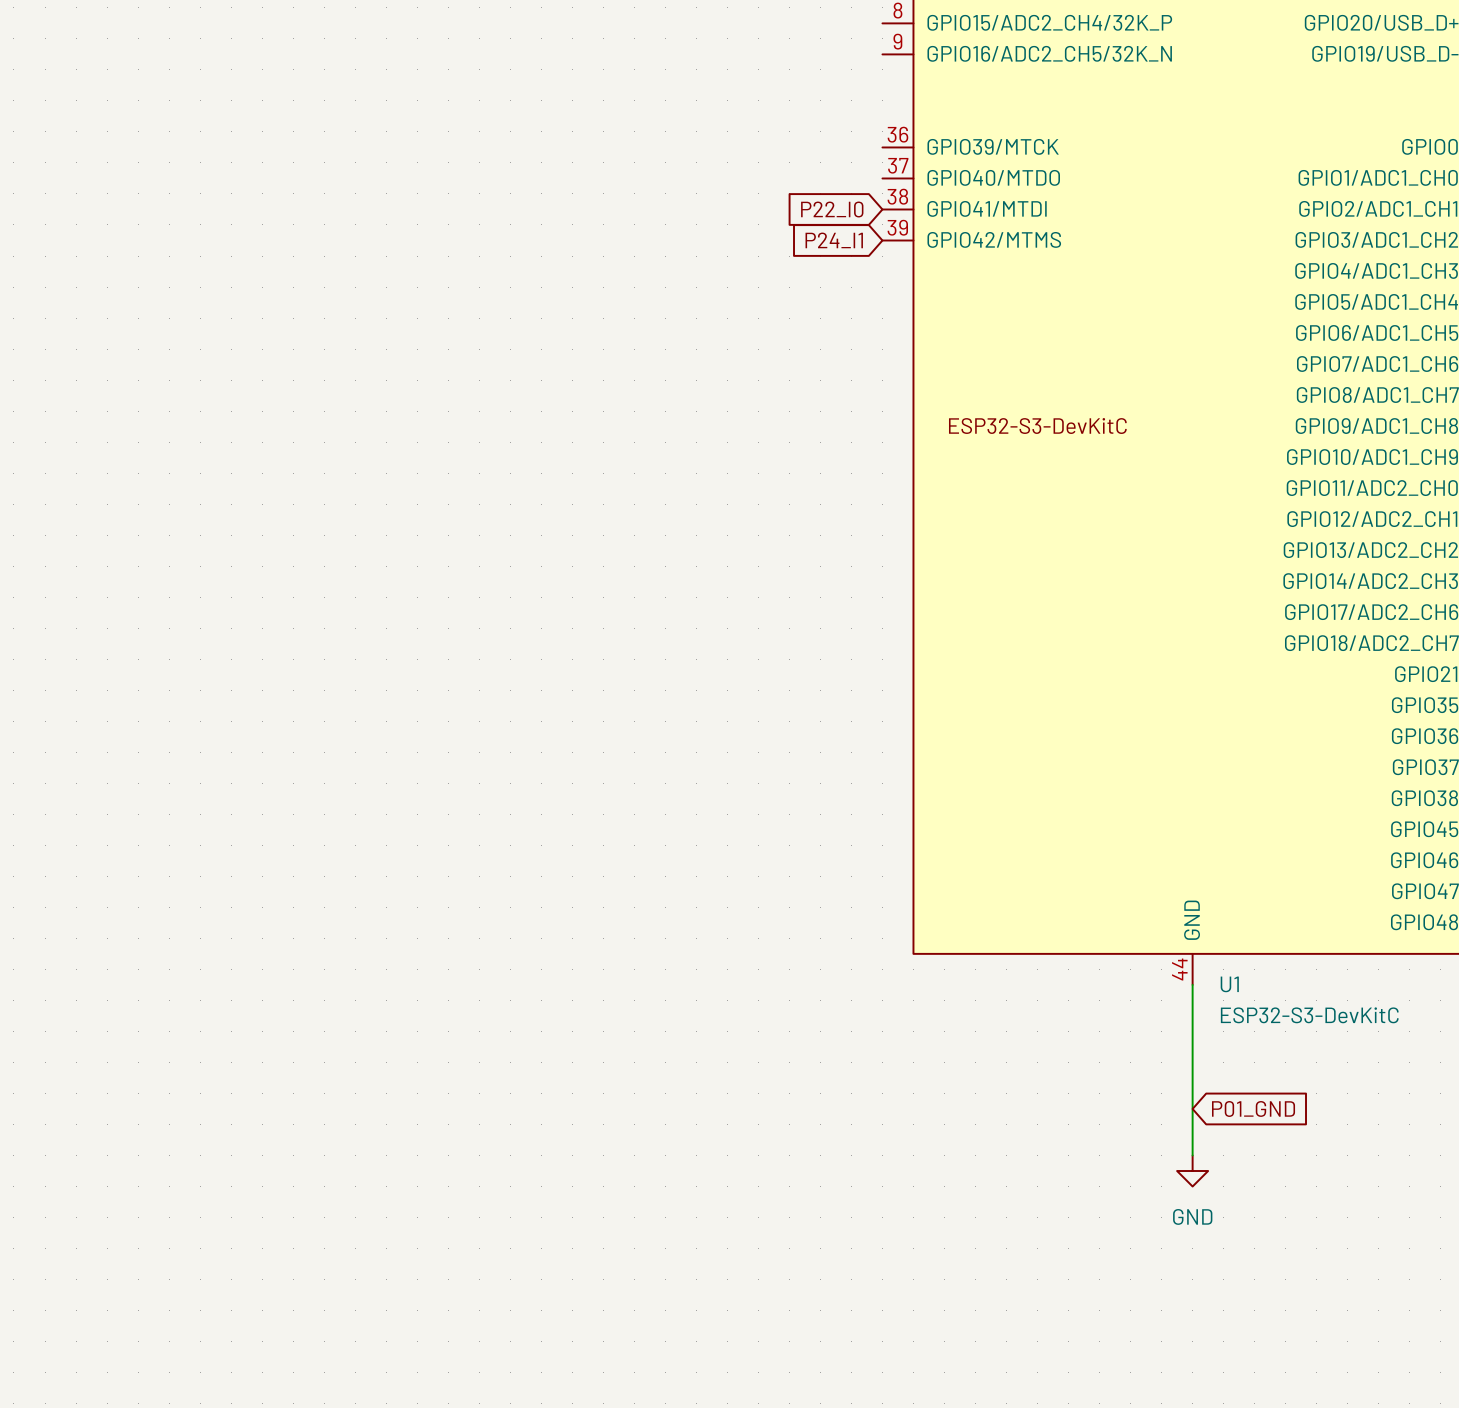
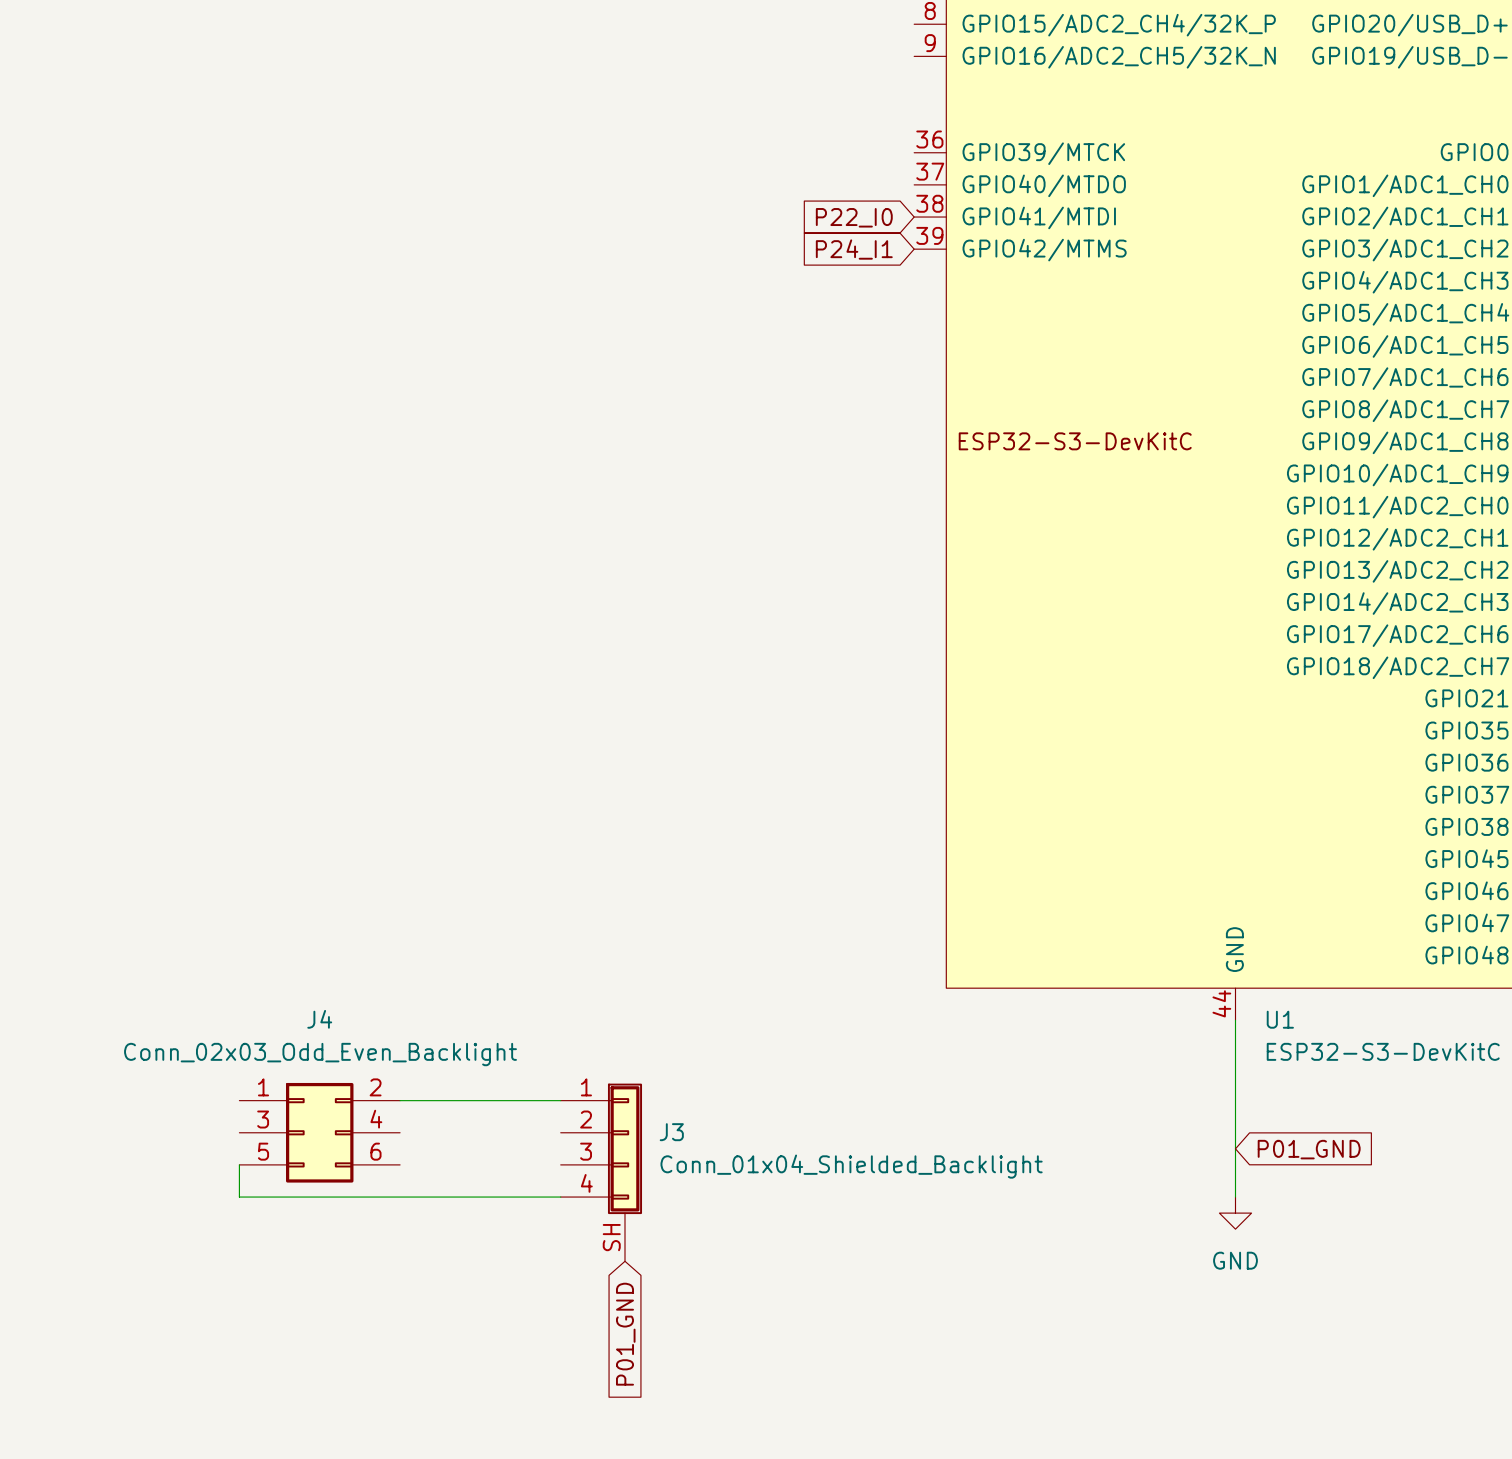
wire: none -> (400, 1100) (560, 1100)
J4: none -> Conn_02x03_Odd_Even_Backlight (319, 1132)
wire: none -> (239, 1164) (239, 1197) (560, 1197)
J3: none -> Conn_01x04_Shielded_Backlight (601, 1172)
global label: none -> P01_GND (625, 1334)

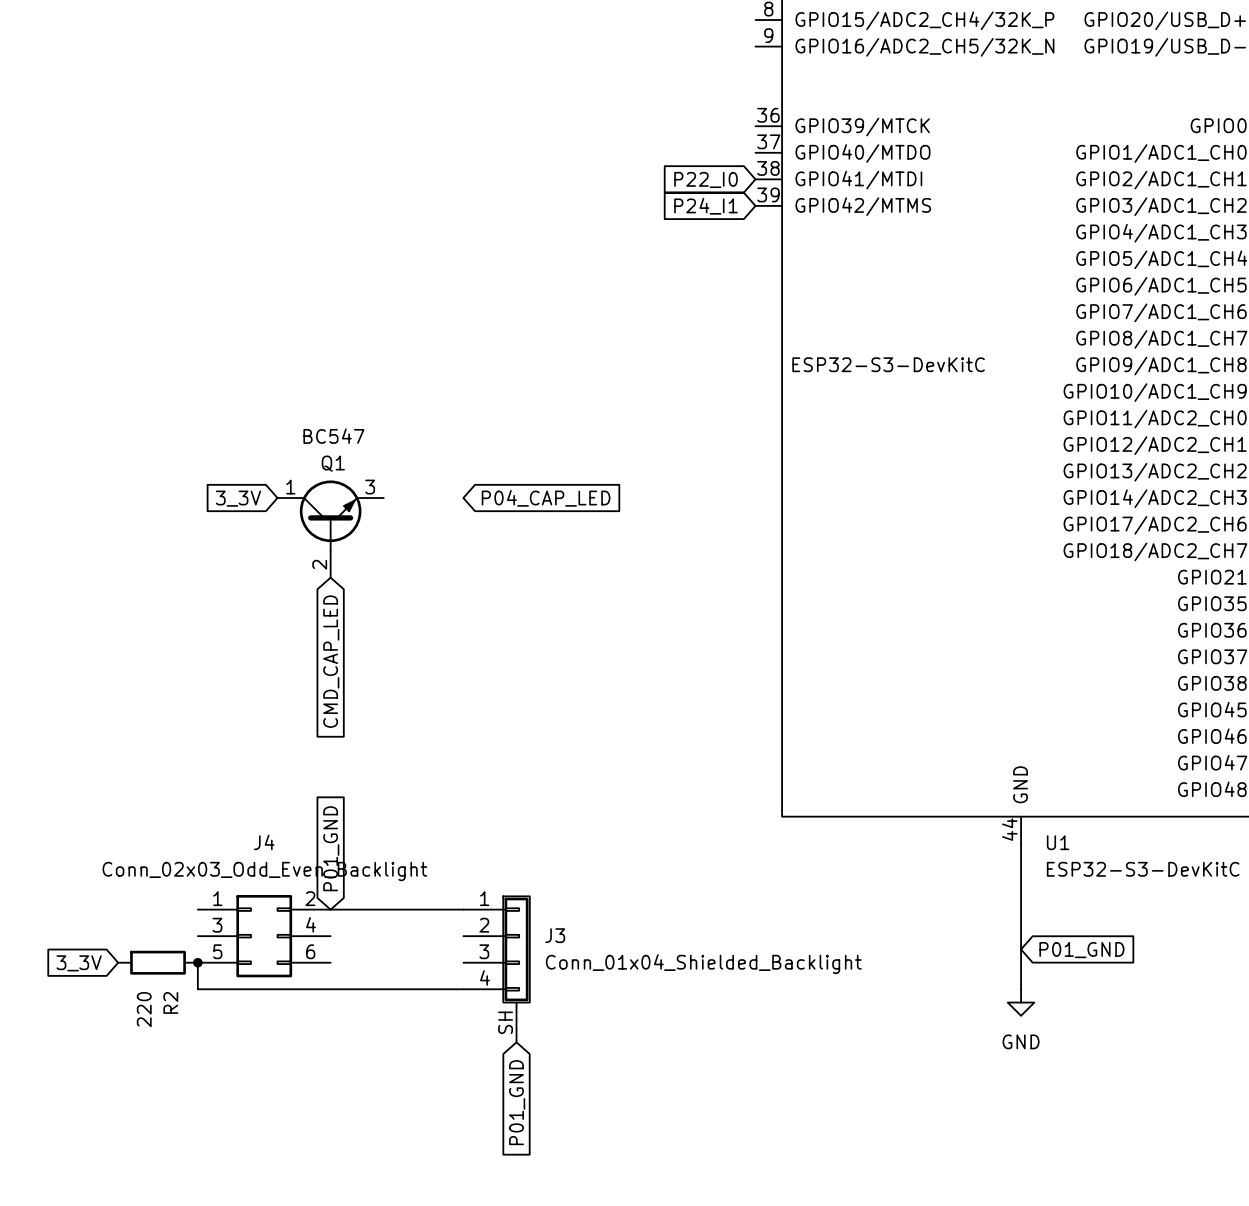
global label: none -> P04_CAP_LED (546, 498)
global label: none -> 3_3V (238, 498)
Q1: none -> BC547 (330, 529)
global label: none -> CMD_CAP_LED (331, 661)
global label: none -> P01_GND (331, 848)
R2: none -> 220 (158, 962)
junction: none -> (197, 962)
global label: none -> 3_3V (79, 963)

